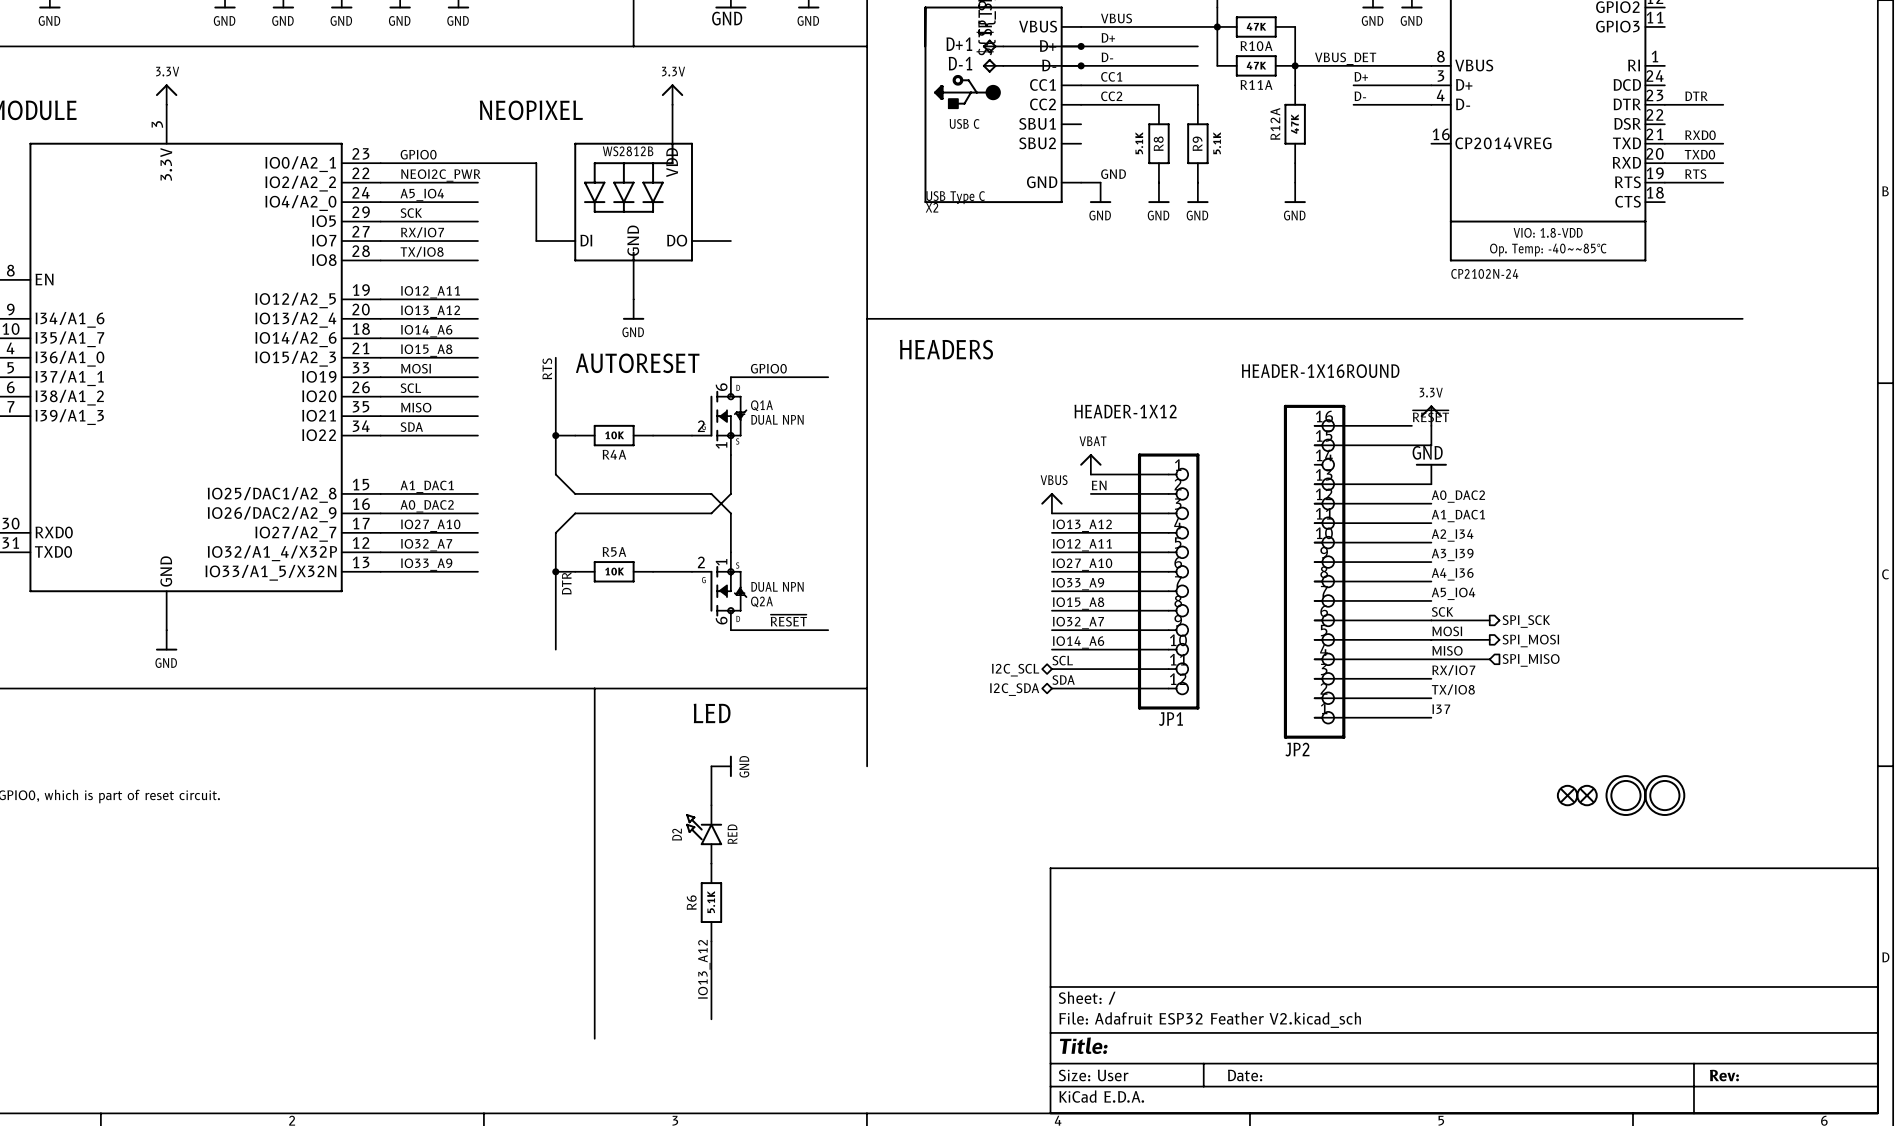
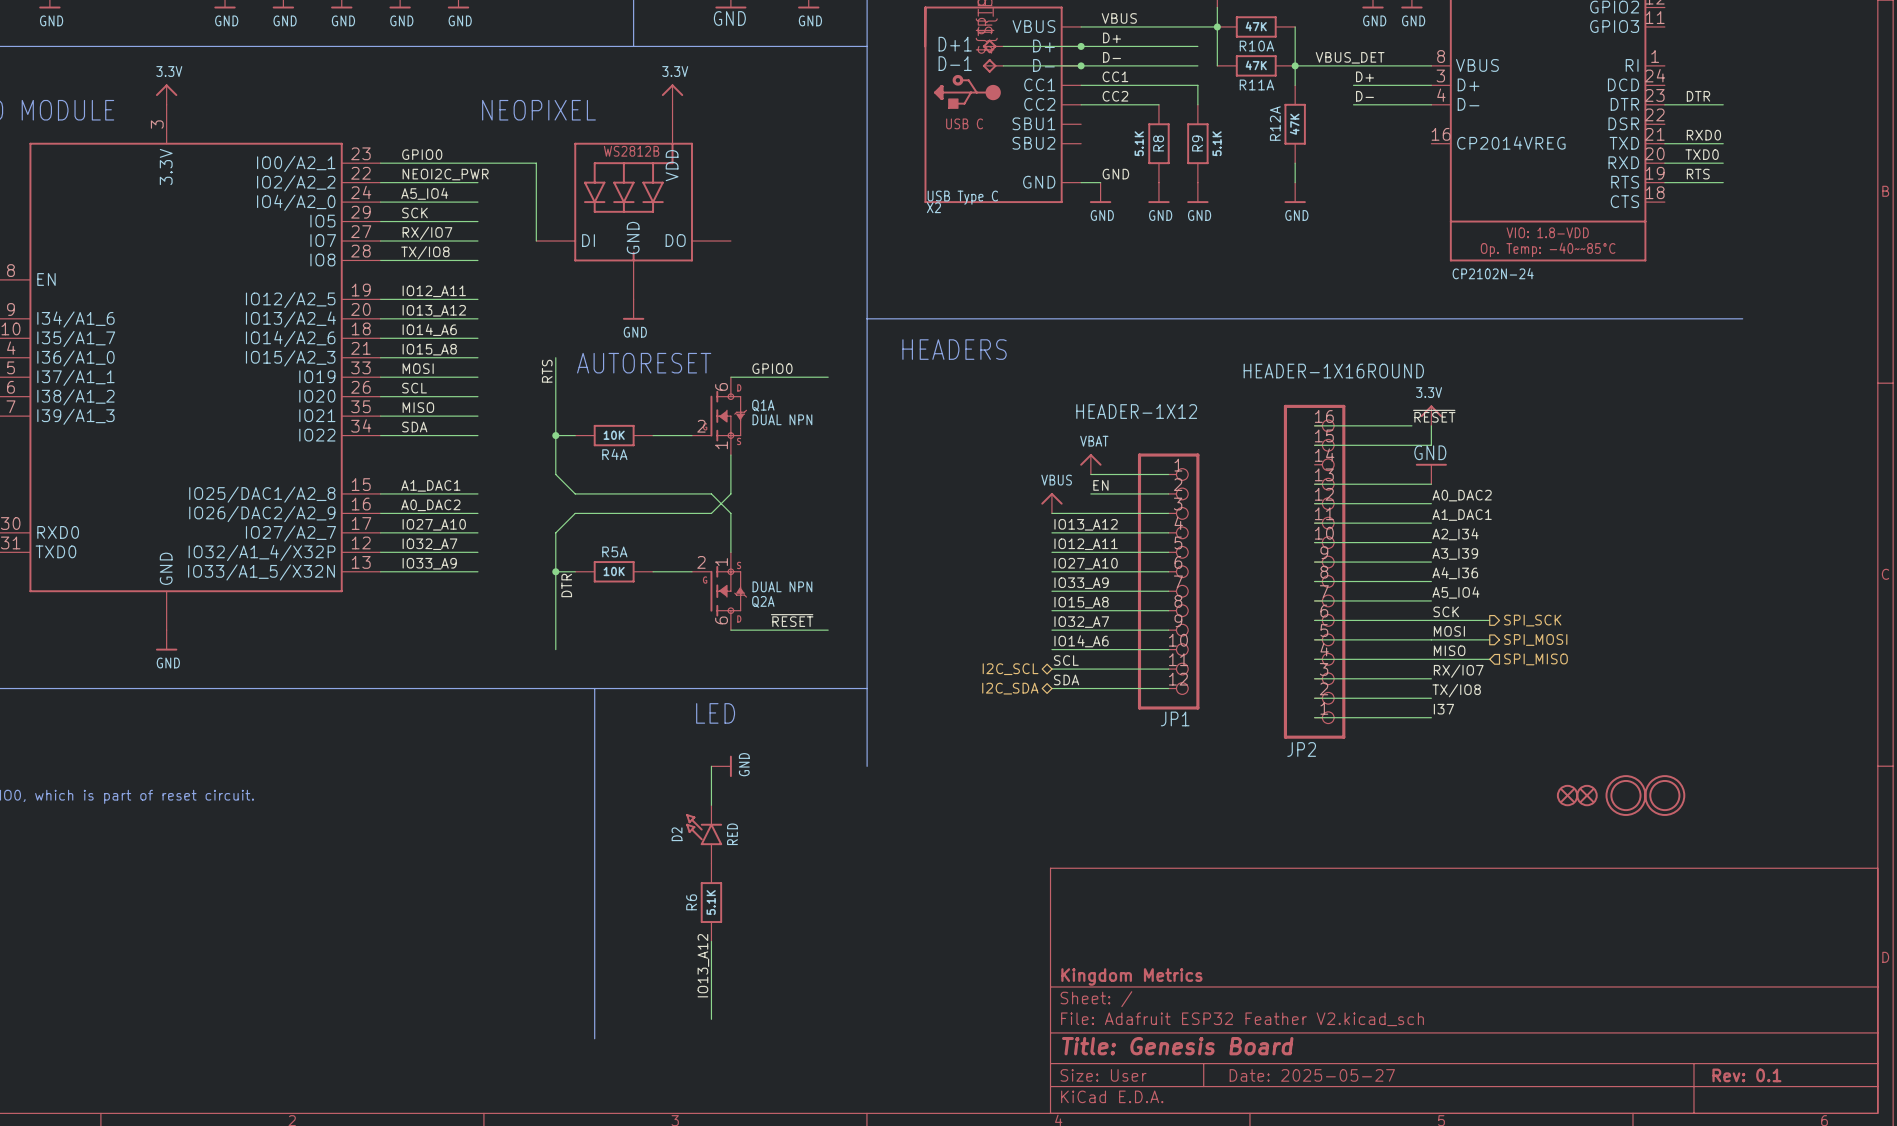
title block: none -> Kingdom Metrics (1131, 976)
title block: Title: (1083, 1045) -> Title: Genesis Board (1177, 1046)
title block: Date: (1245, 1075) -> Date: 2025-05-27 (1312, 1075)
title block: Rev: (1724, 1075) -> Rev: 0.1 (1746, 1075)

